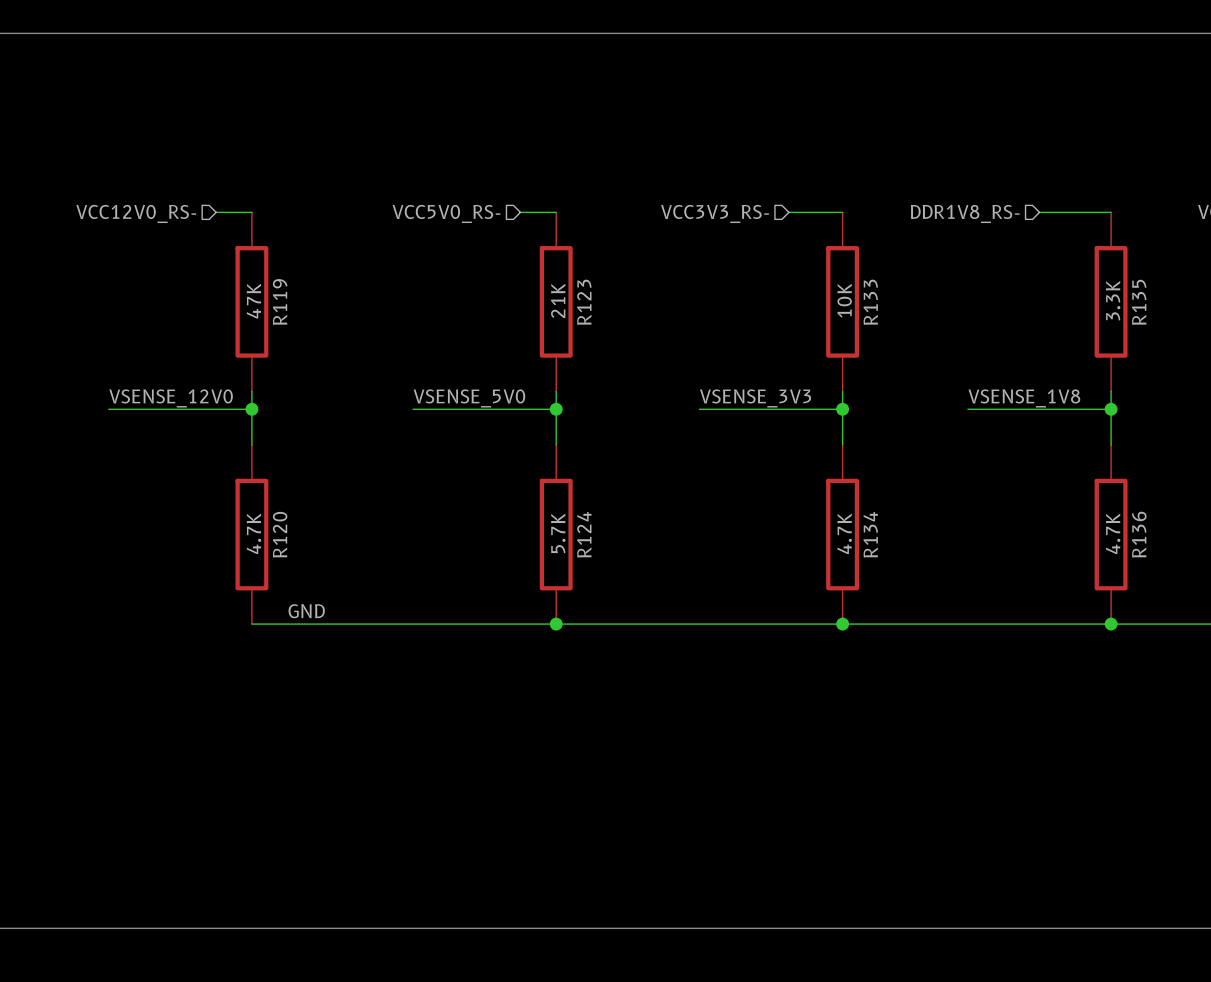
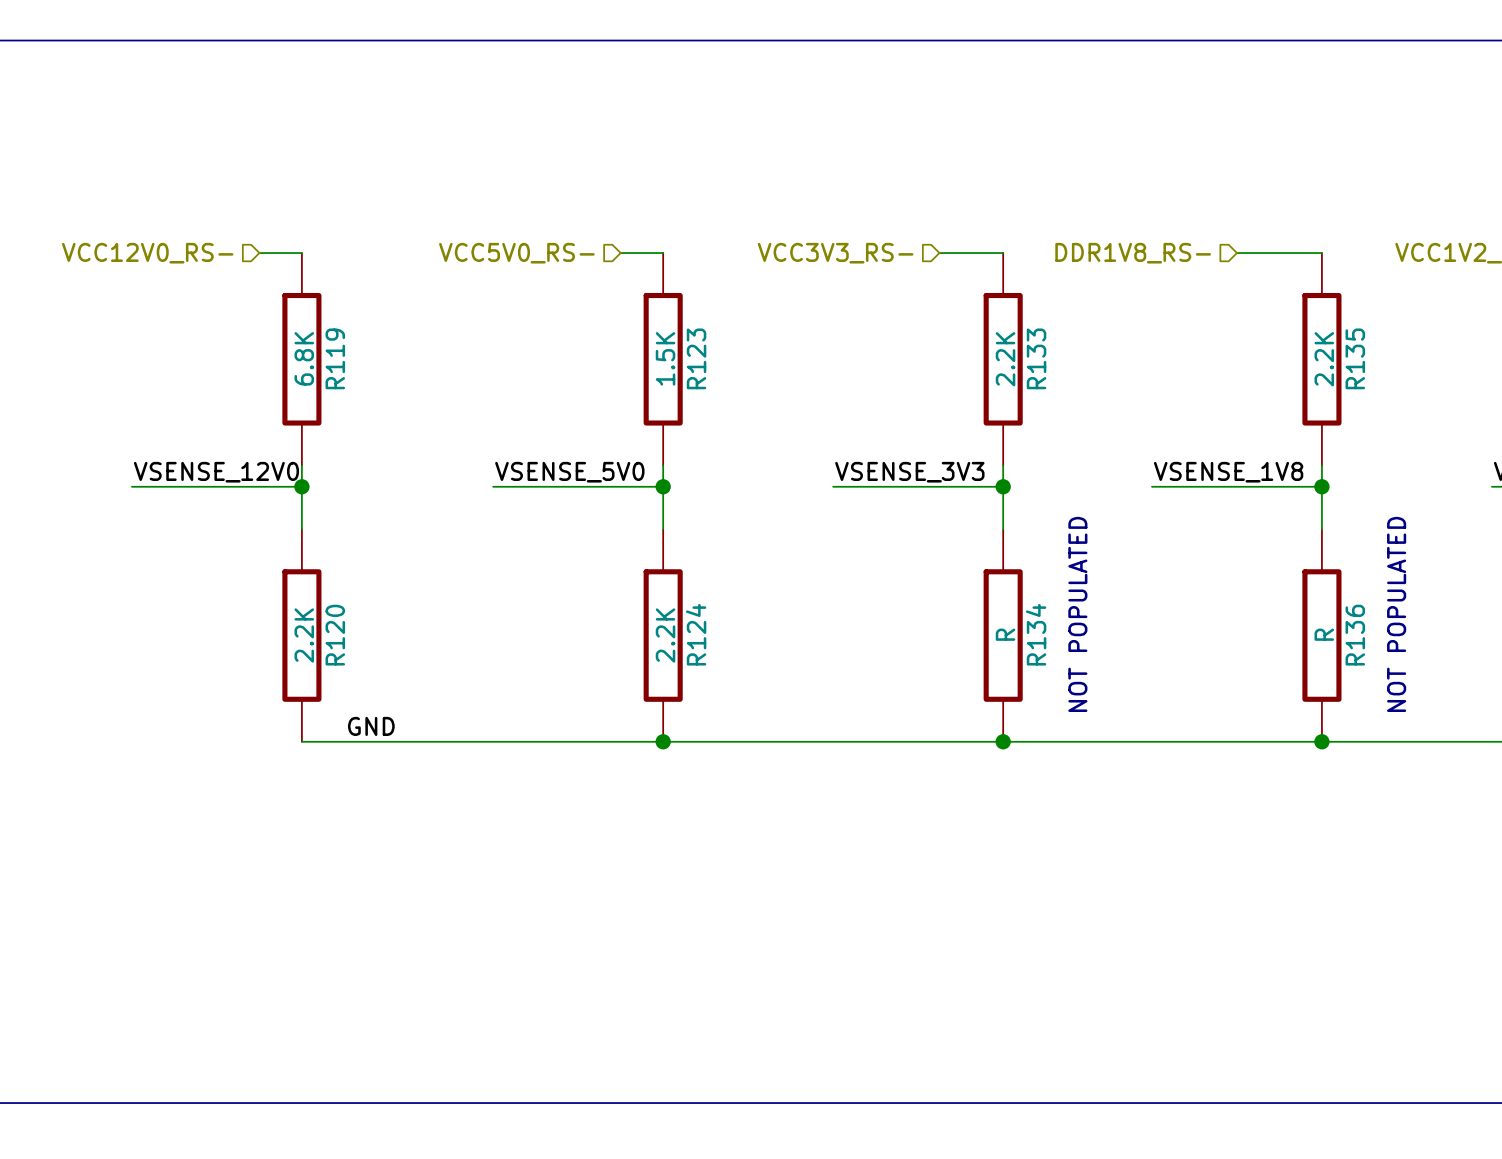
R123 value: 21K (558, 300) -> 1.5K (665, 358)
R133 value: 10K (844, 300) -> 2.2K (1005, 359)
R135 value: 3.3K (1113, 300) -> 2.2K (1324, 359)
R119 value: 47K (253, 301) -> 6.8K (304, 358)
text: none -> NOT POPULATED (1077, 614)
text: none -> NOT POPULATED (1396, 614)
R120 value: 4.7K (253, 533) -> 2.2K (304, 635)
R124 value: 5.7K (558, 533) -> 2.2K (665, 635)
R134 value: 4.7K (844, 533) -> R (1005, 634)
R136 value: 4.7K (1113, 533) -> R (1324, 634)

